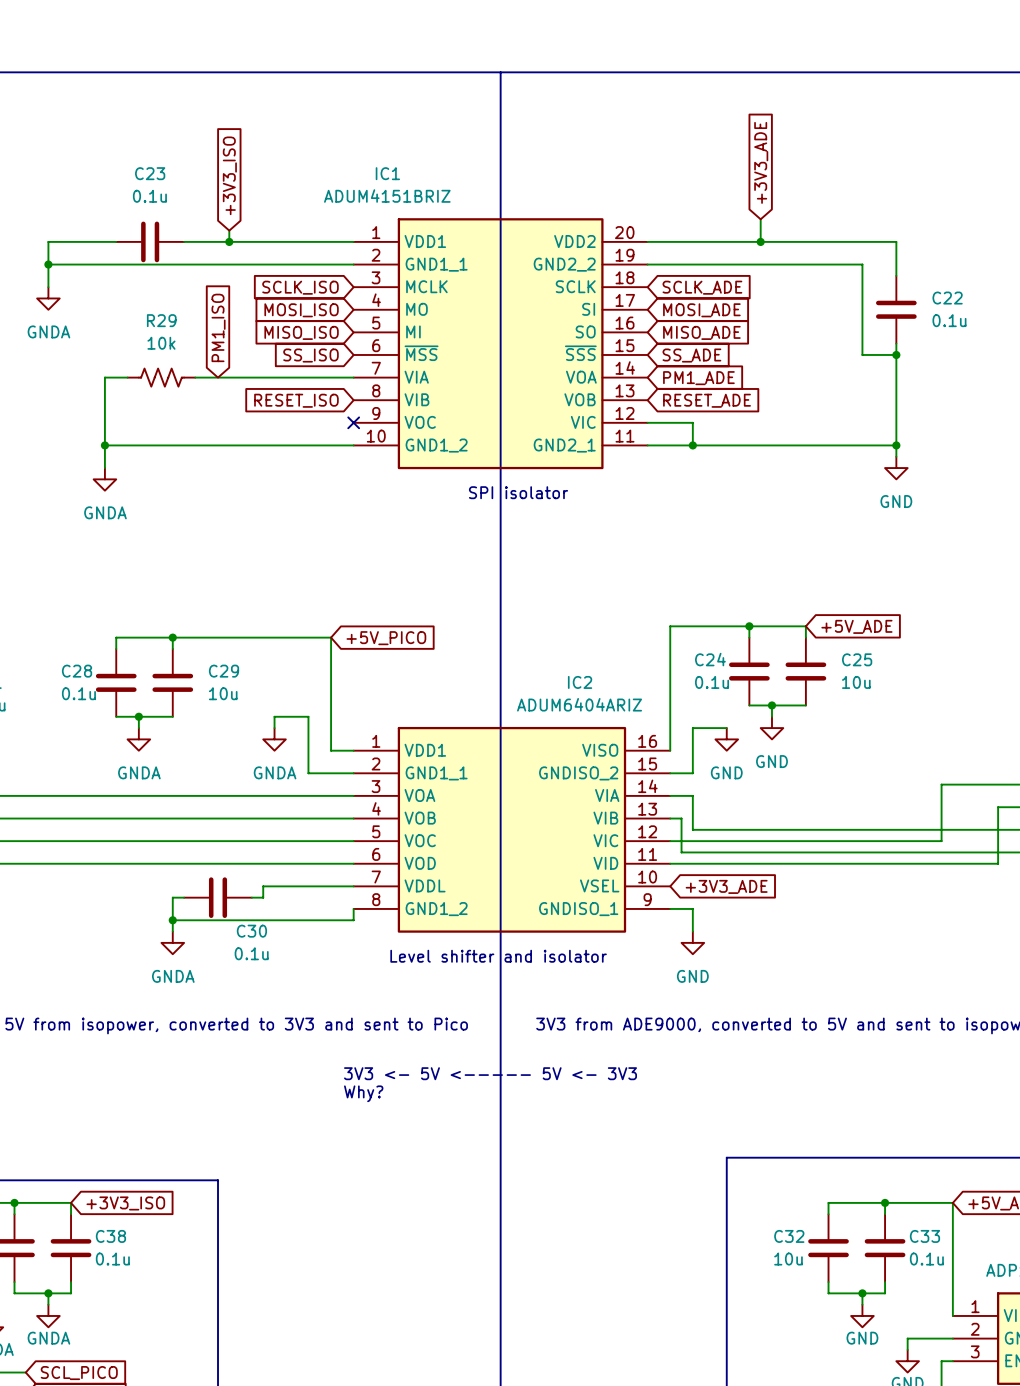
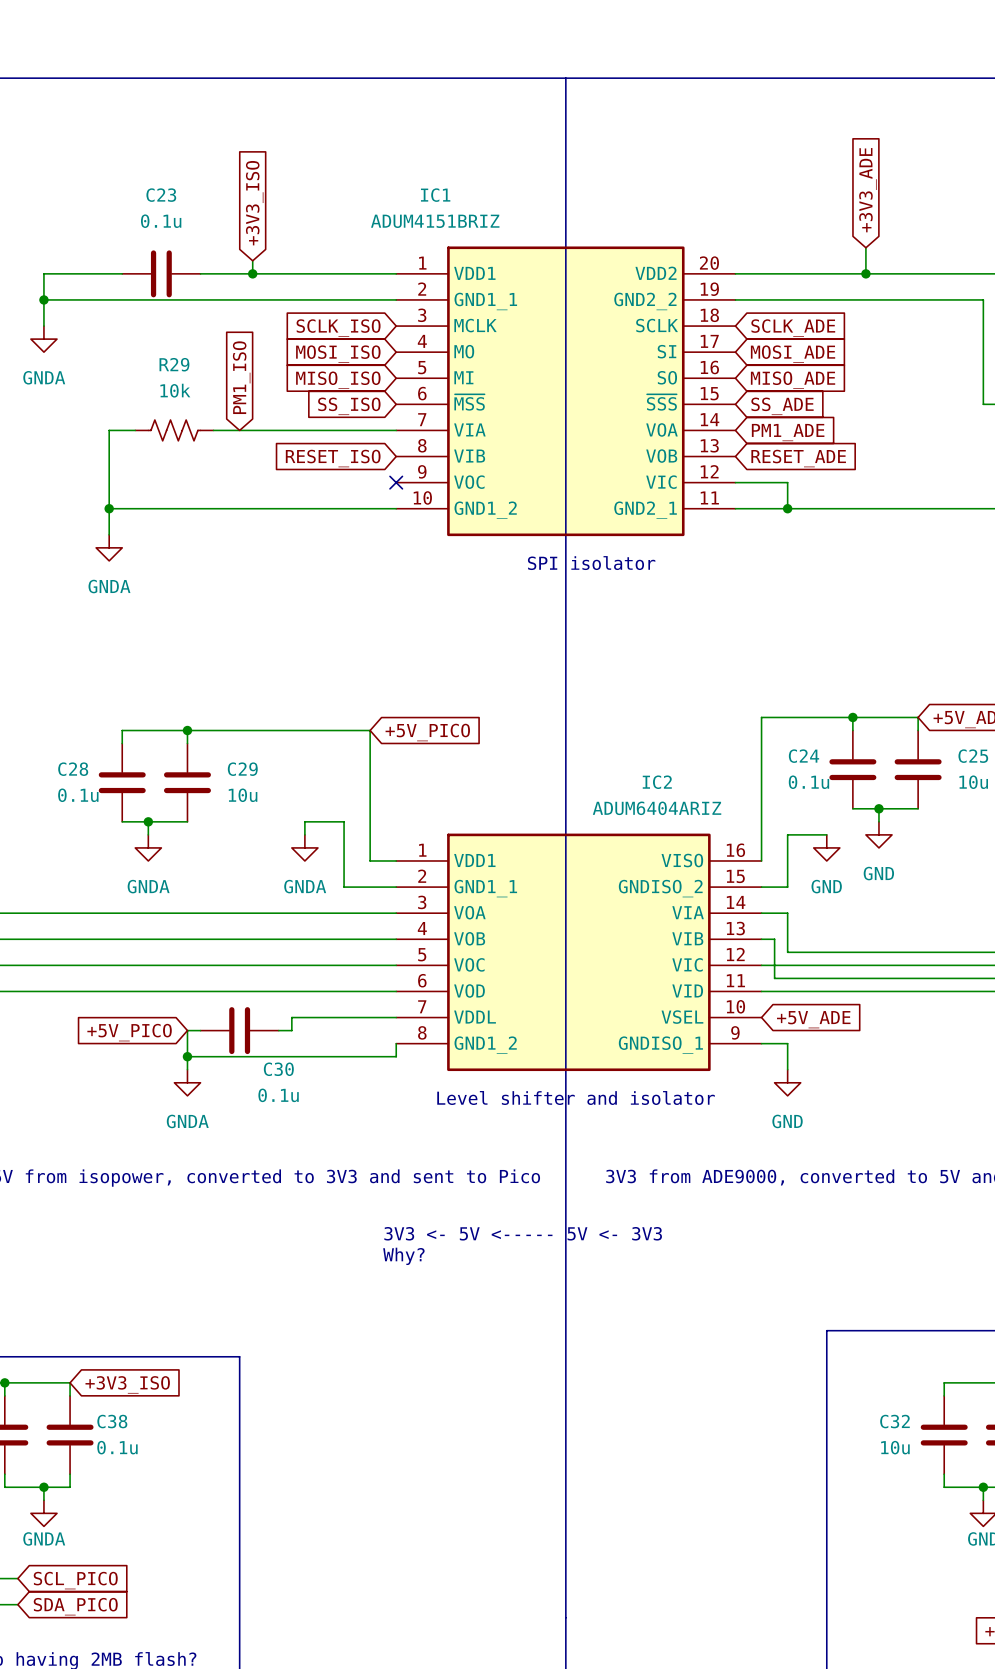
global label: +3V3_ADE (726, 886) -> +5V_ADE (813, 1019)
global label: none -> +5V_PICO (129, 1032)

